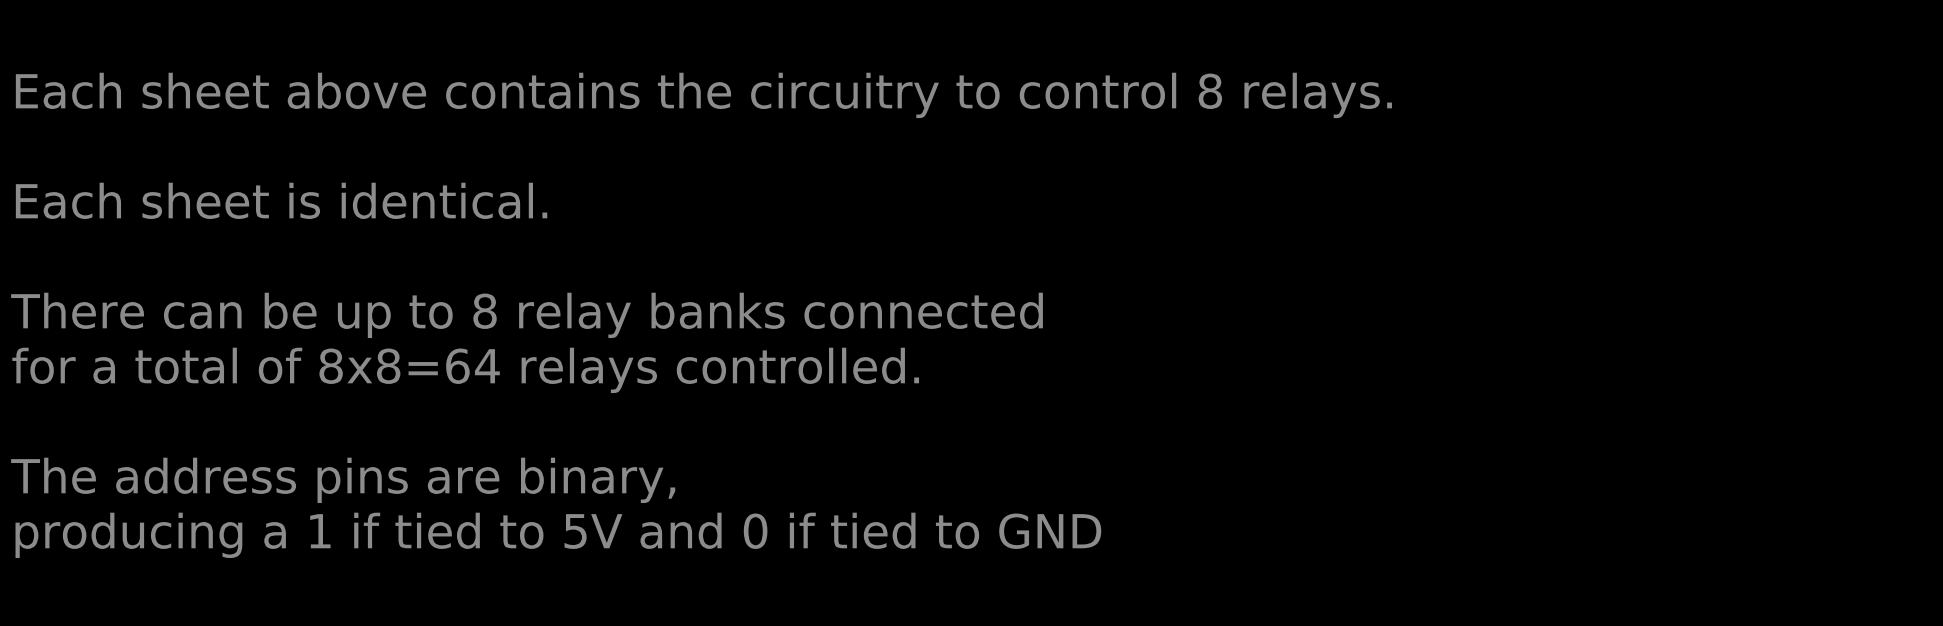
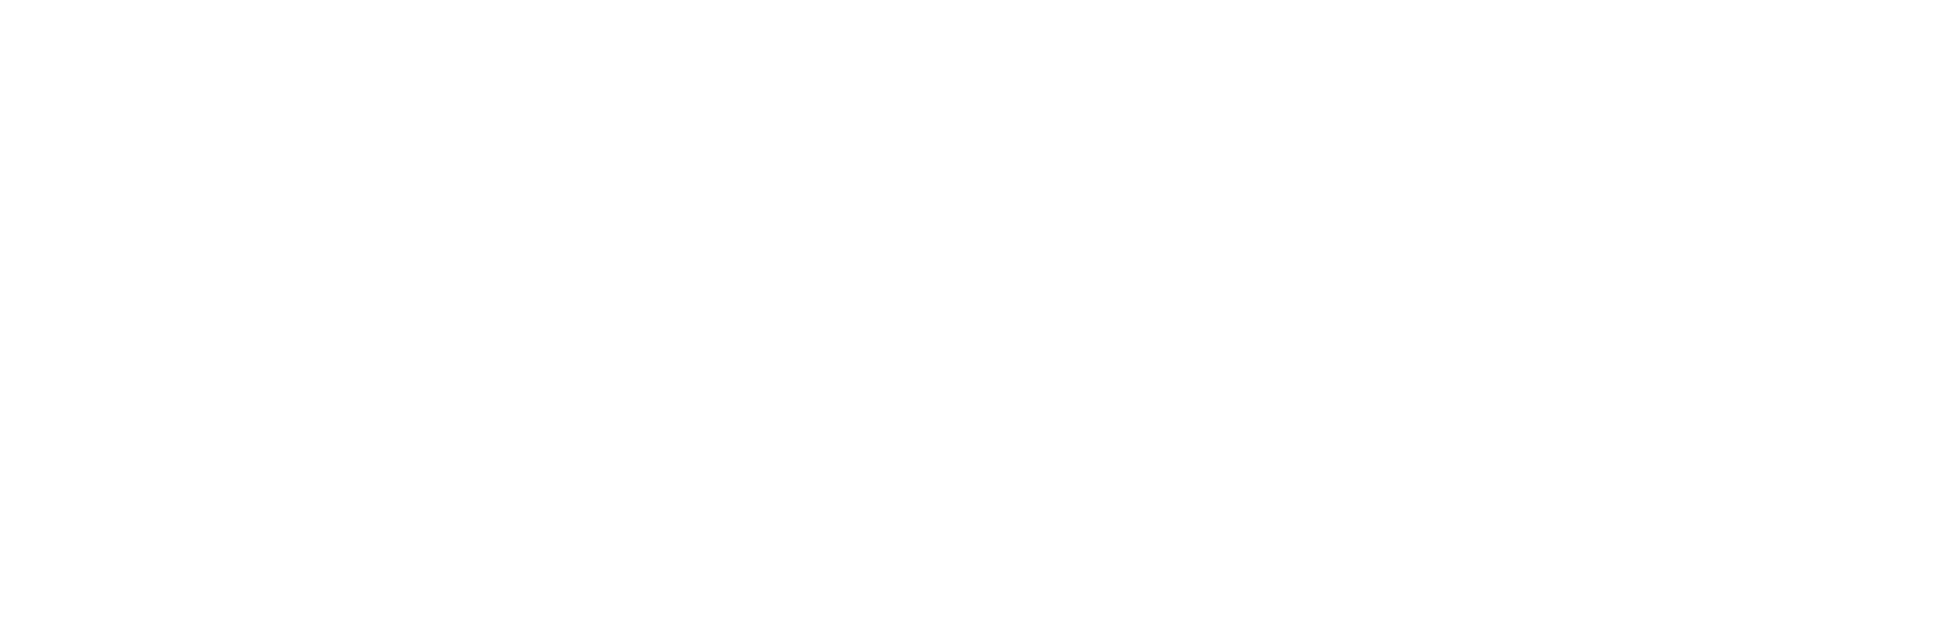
text: Each sheet above contains the circuitry to control 8 relays. (703, 95) -> none
text: Each sheet is identical. (281, 200) -> none
text: There can be up to 8 relay banks connected (527, 315) -> none
text: for a total of 8x8=64 relays controlled. (465, 370) -> none
text: The address pins are binary, (343, 480) -> none
text: producing a 1 if tied to 5V and 0 if tied to GND (558, 535) -> none

